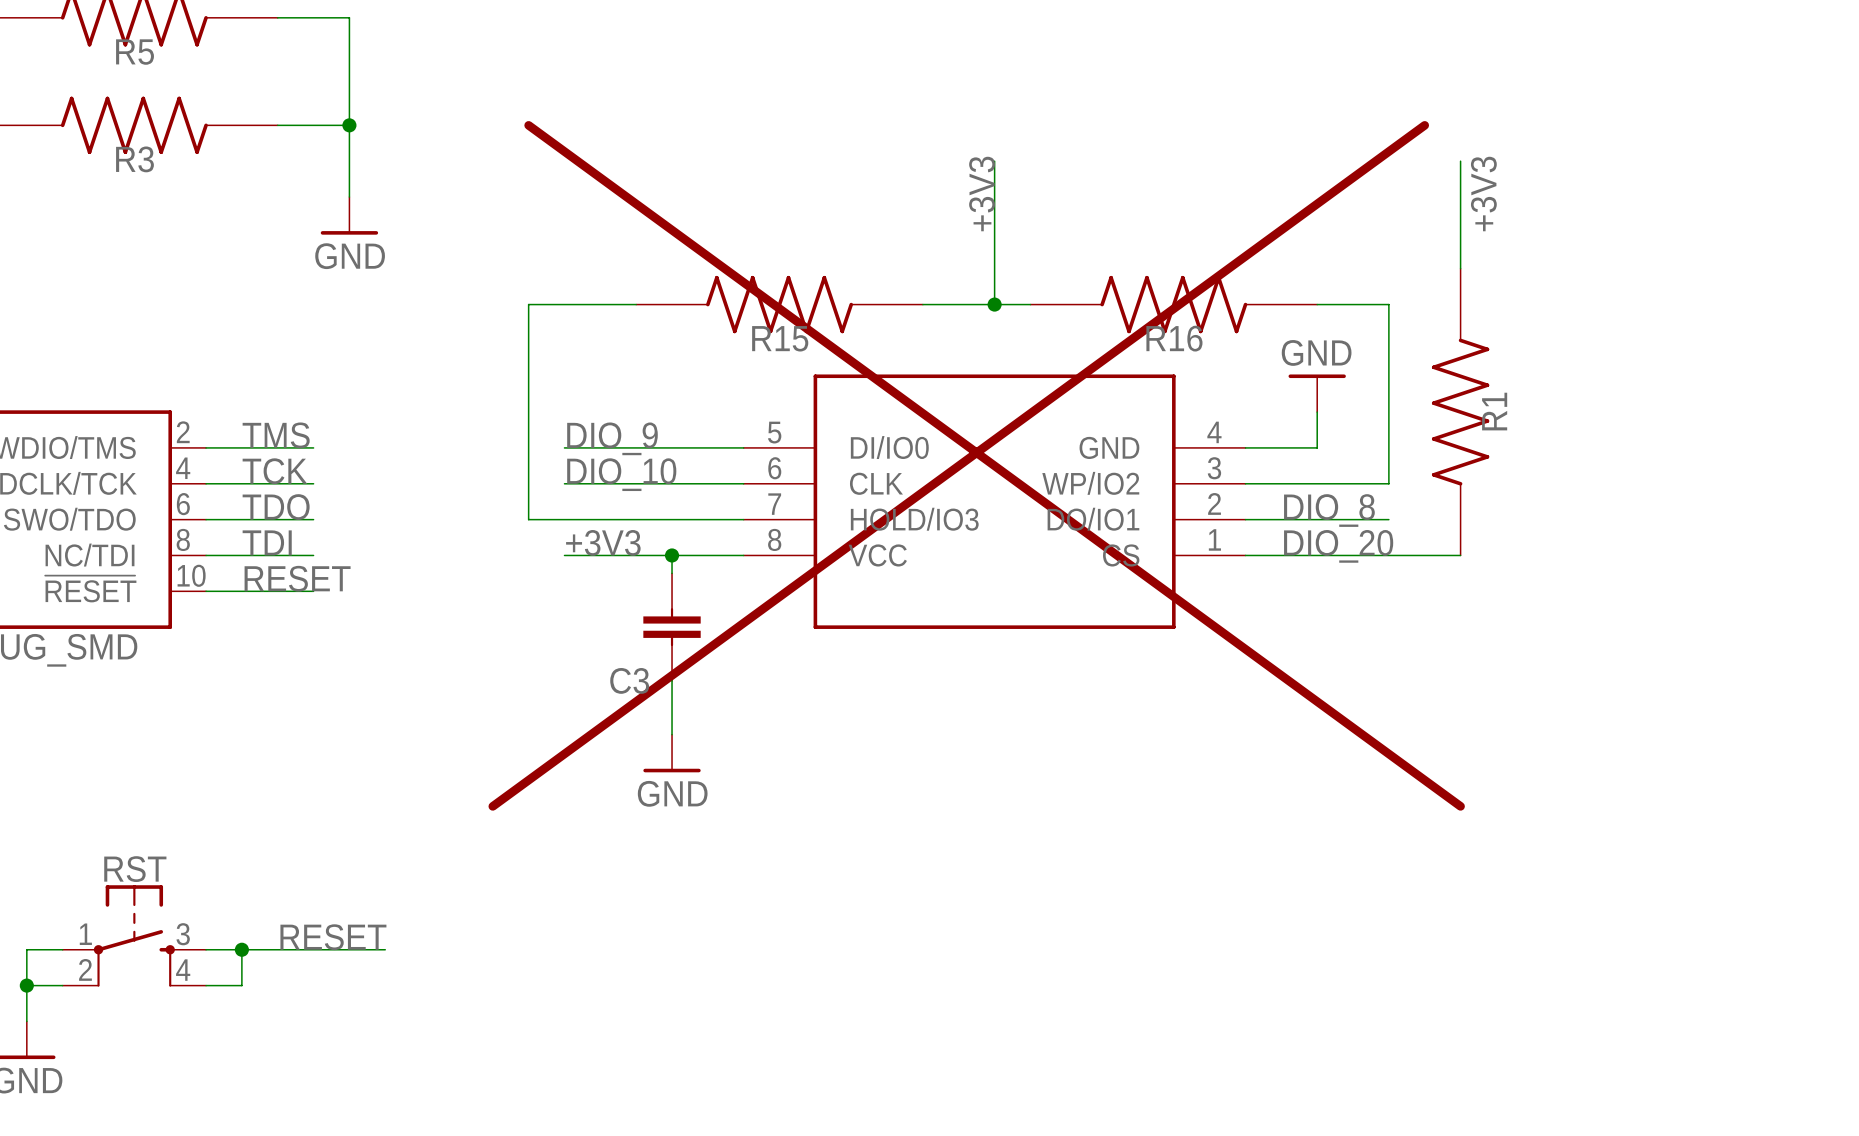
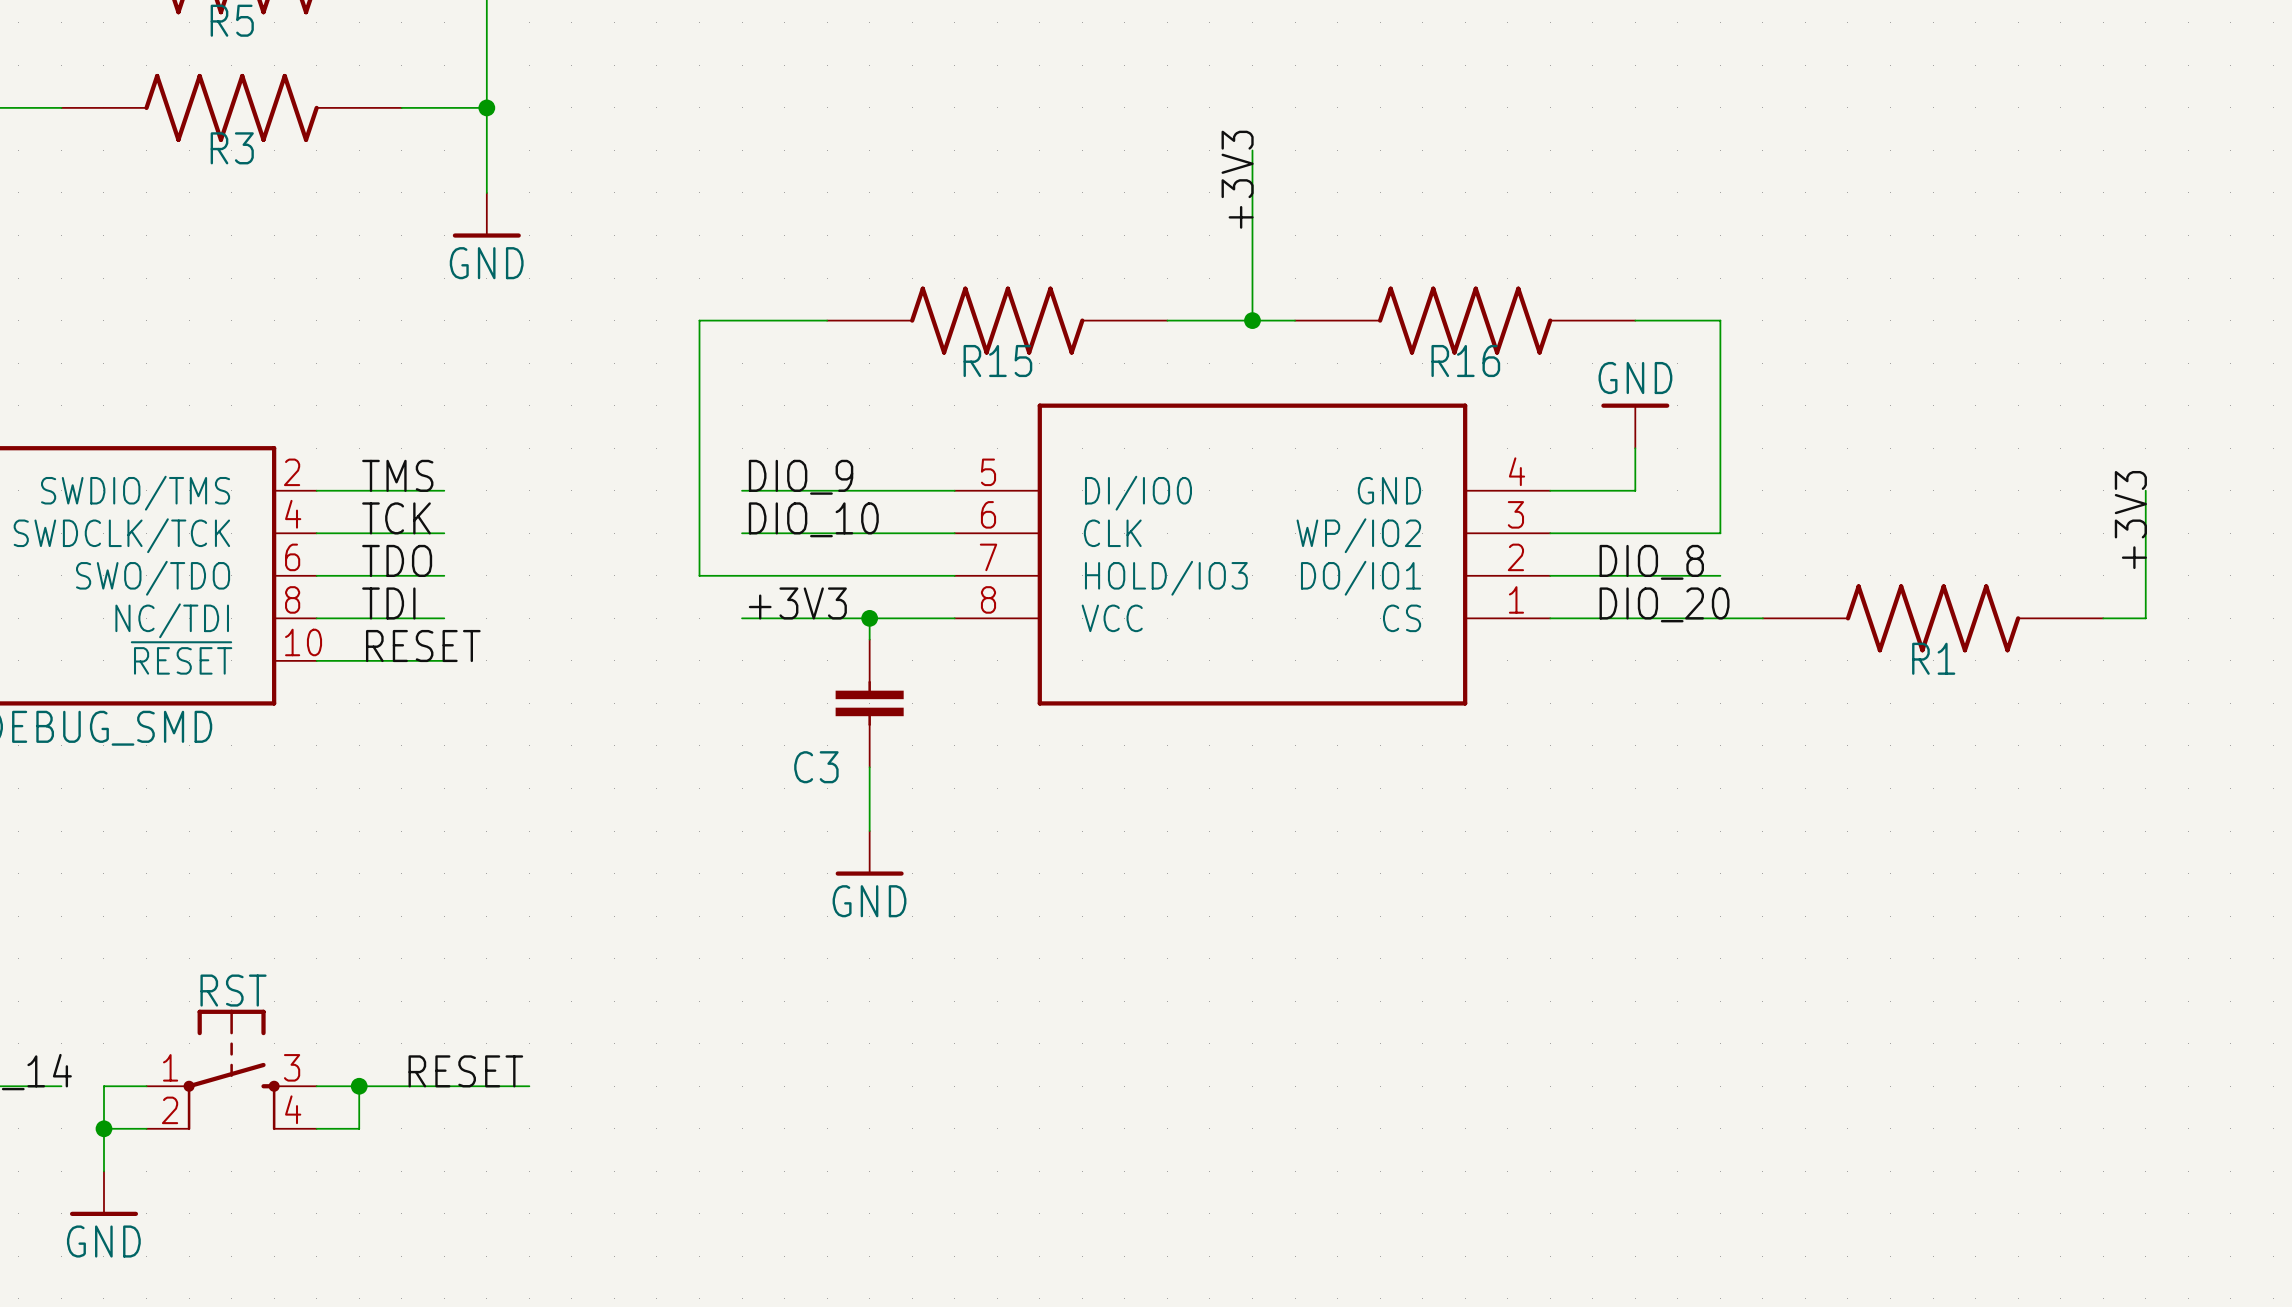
line: (528, 125) (1460, 806) -> none
line: (1424, 125) (492, 806) -> none
wire: (1460, 161) (1460, 268) -> none
label: +3V3 (1483, 194) -> none
R1 rotation: 0° (1460, 412) -> 90° clockwise (1933, 618)
R1 position: (1460, 412) -> (1933, 618)
wire: none -> (2145, 490) (2145, 618) (2103, 618)
label: none -> +3V3 (2130, 520)

